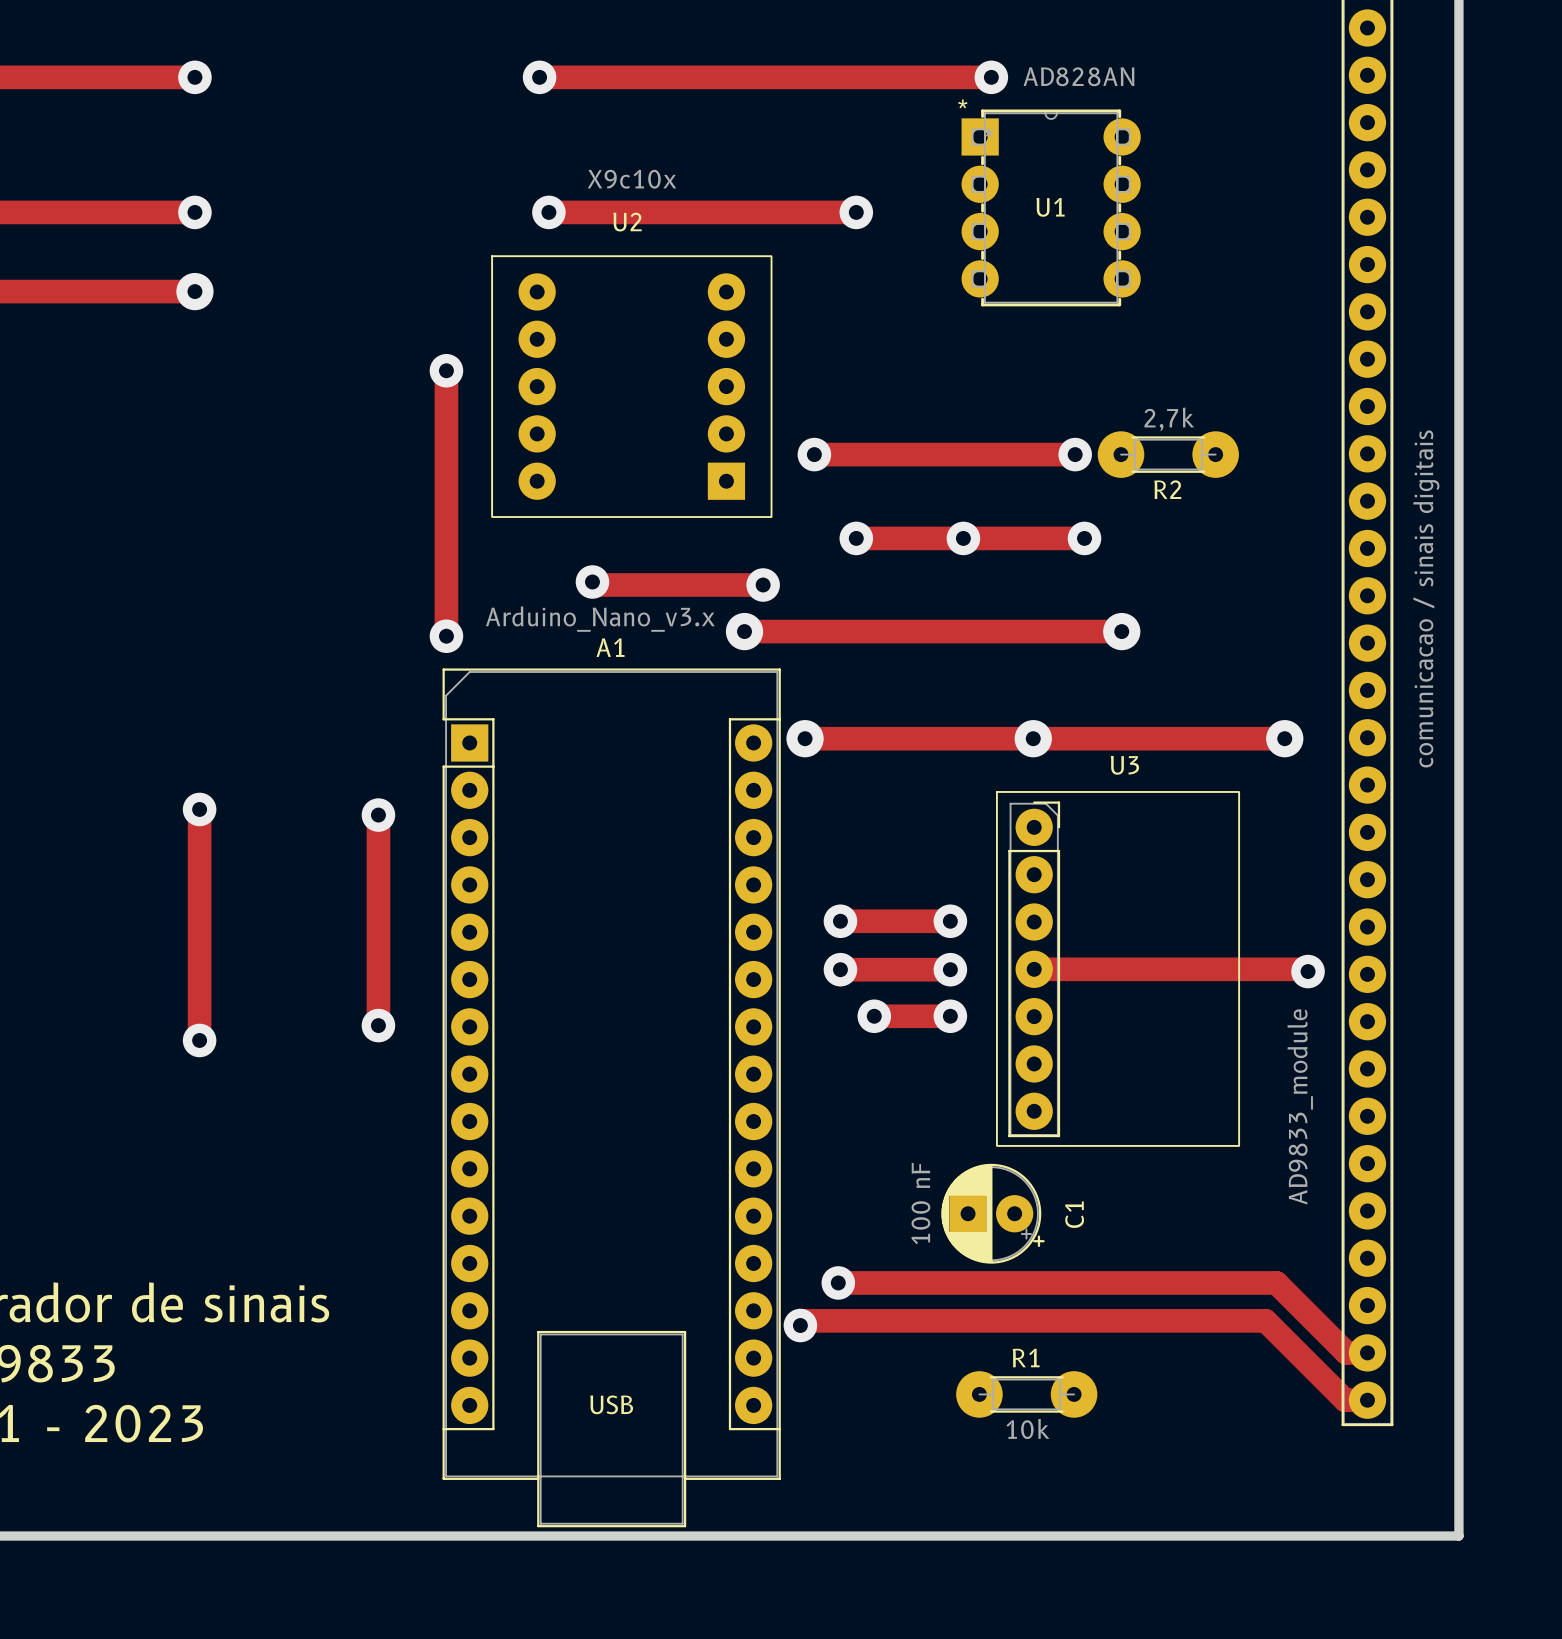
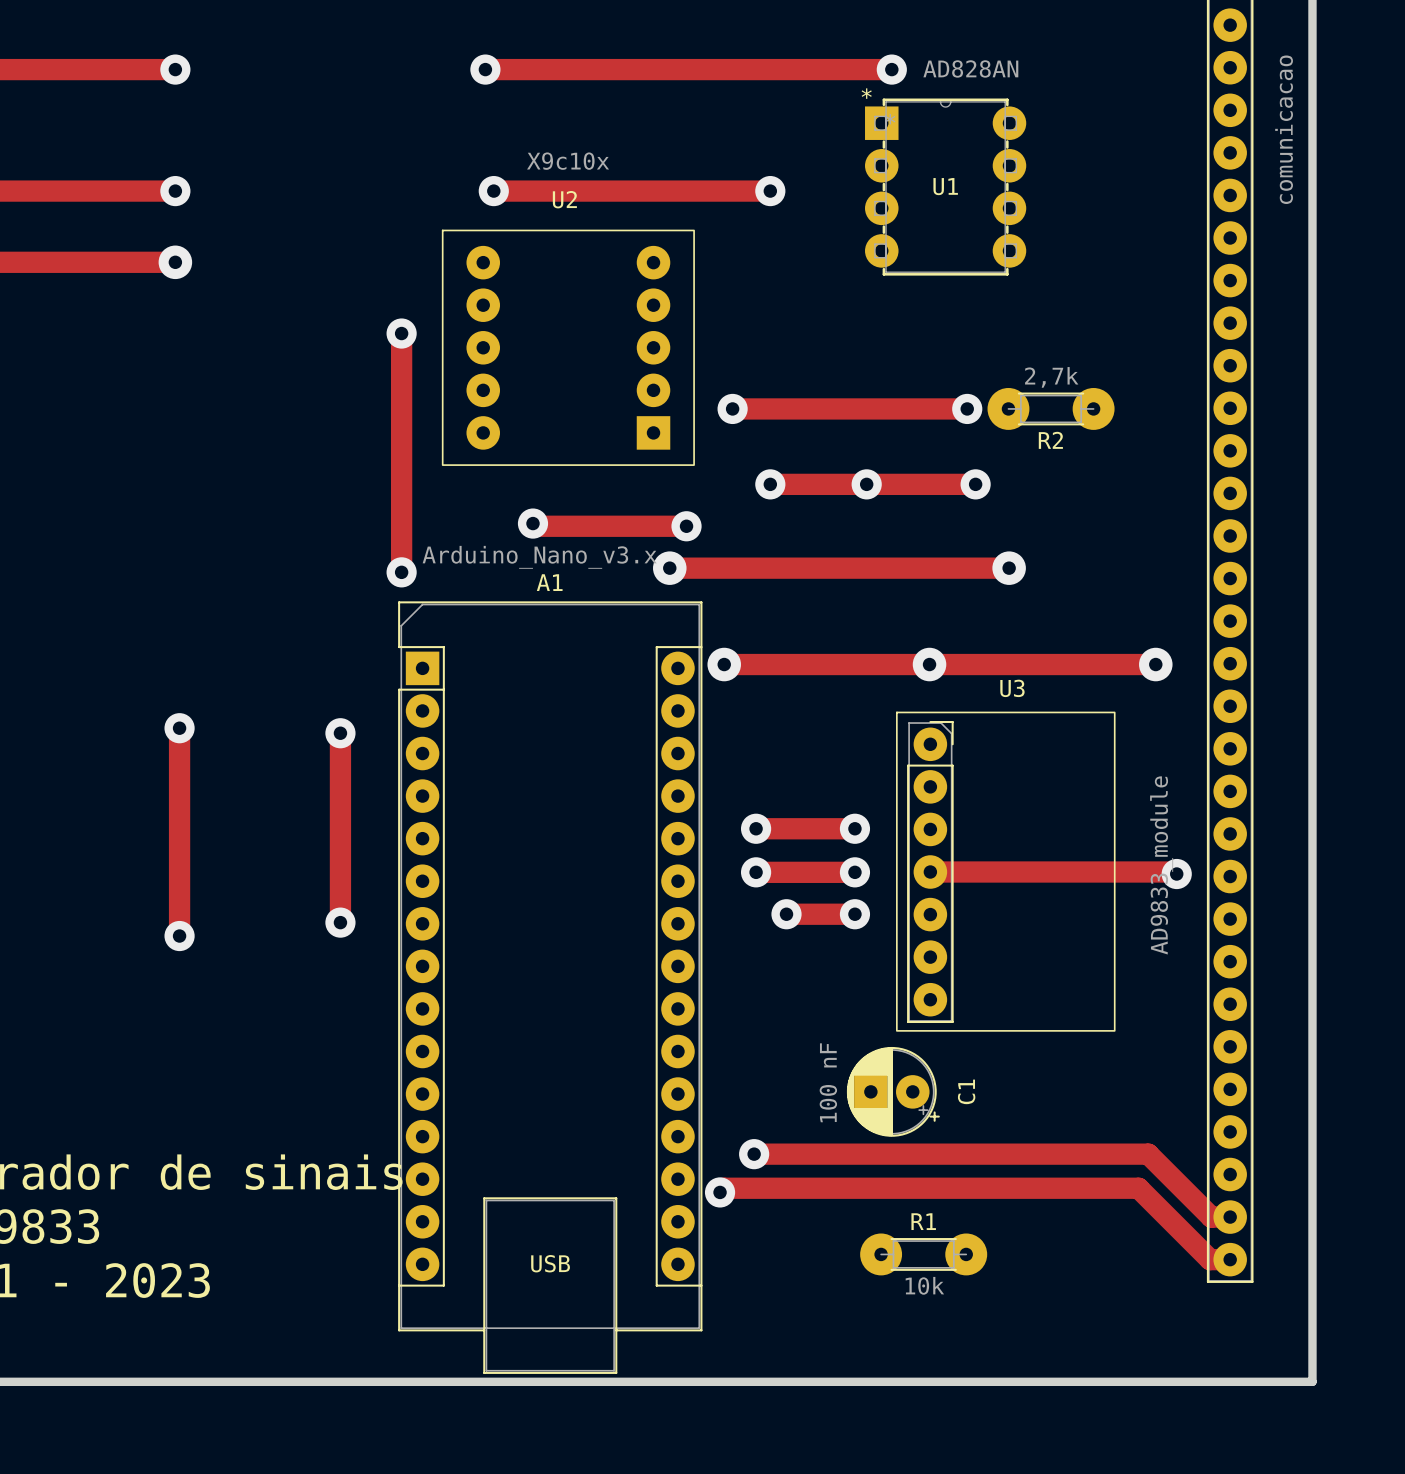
part text: none -> comunicacao (1284, 129)
part value: comunicacao / sinais digitais (1426, 598) -> none
U3 value position: AD9833_module (1300, 1106) -> AD9833_module (1161, 865)

